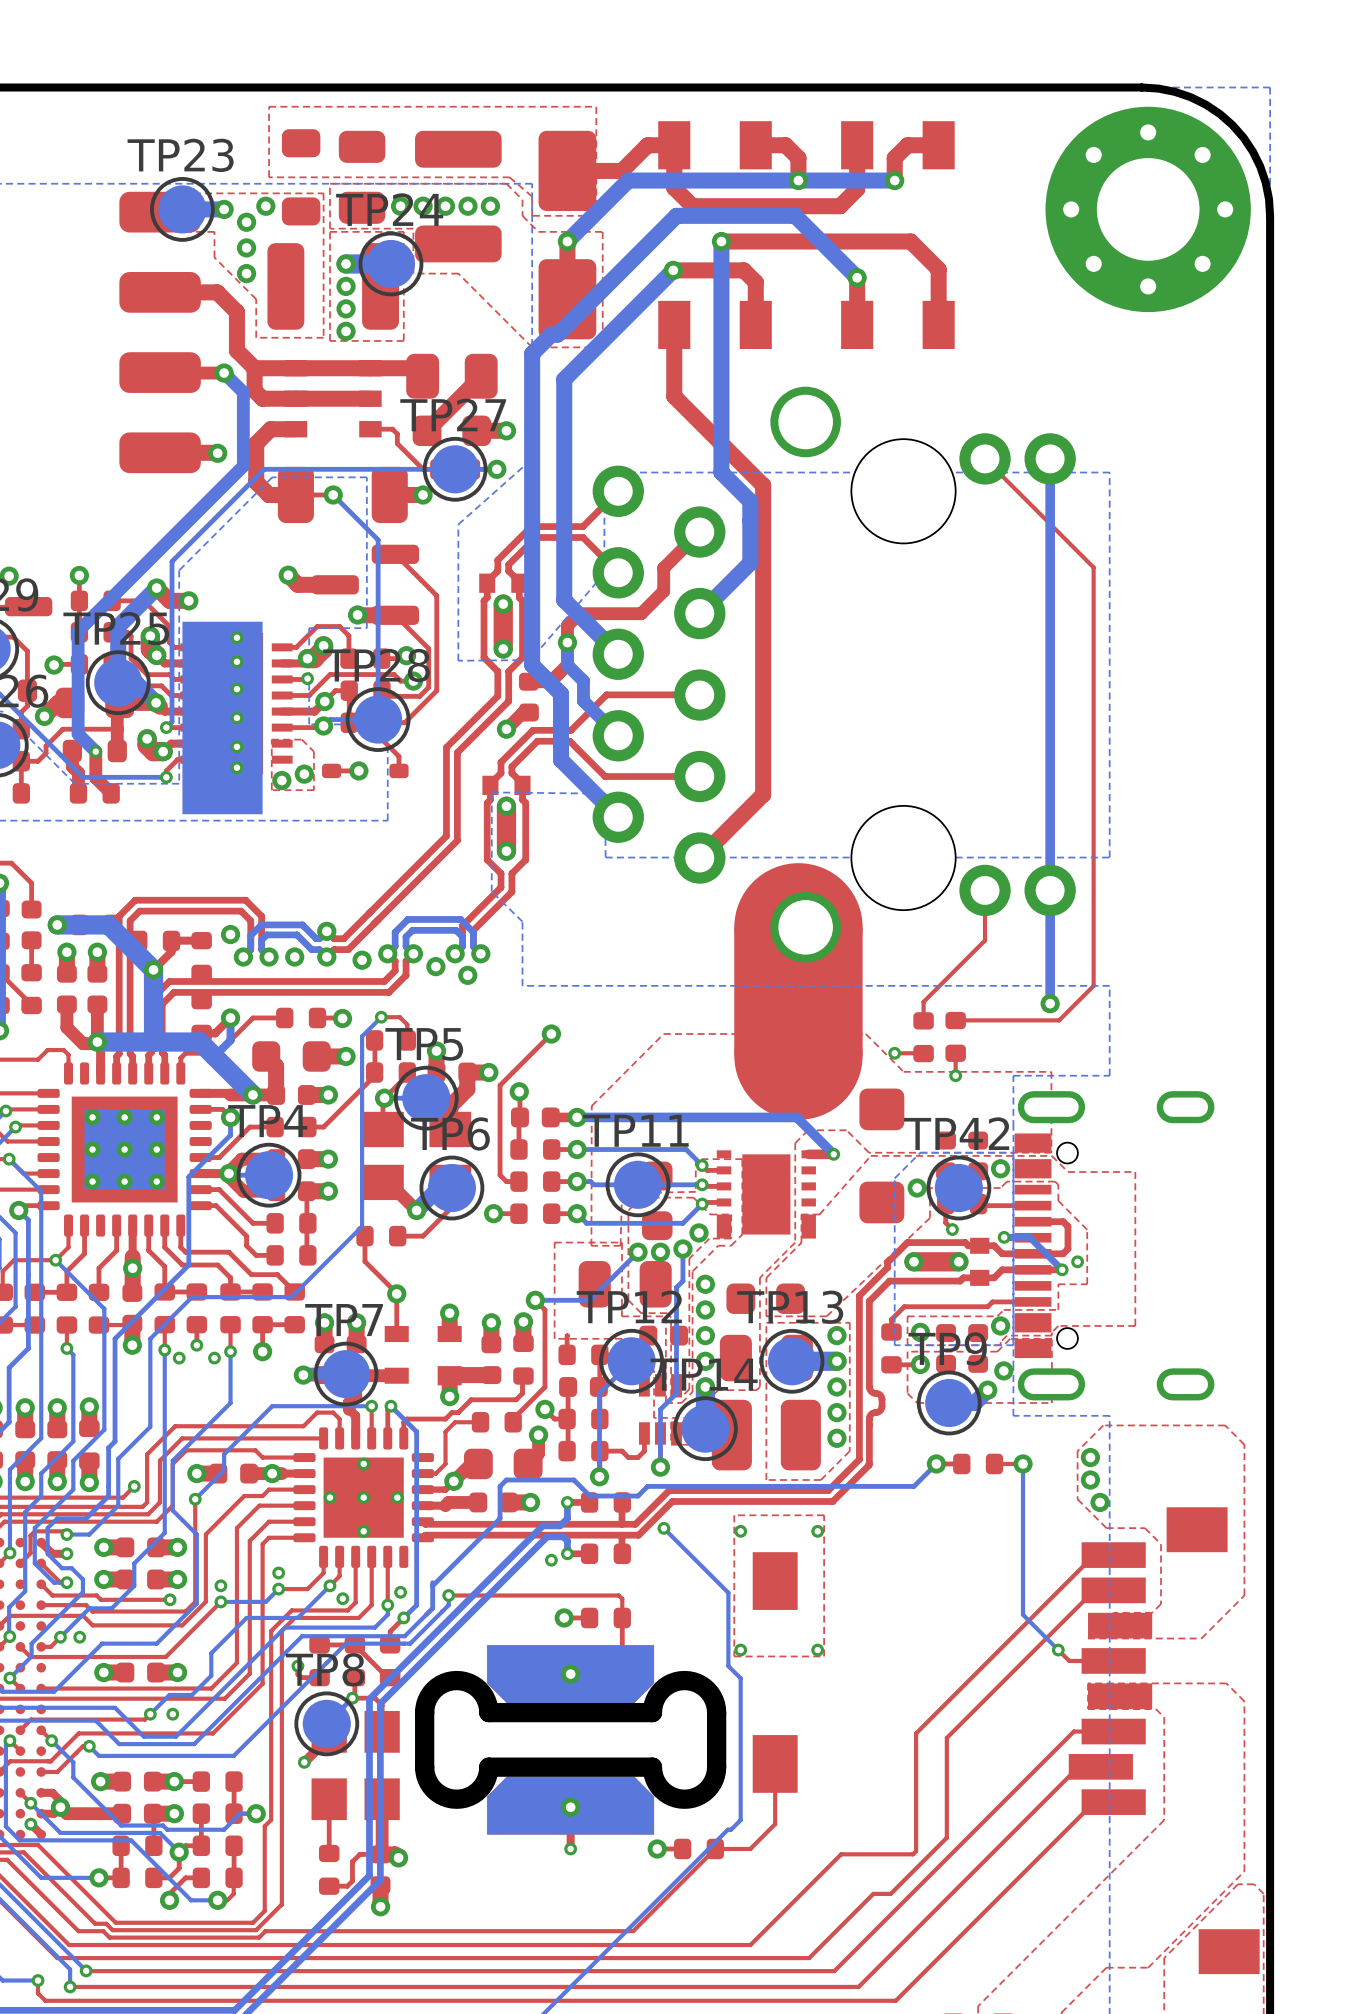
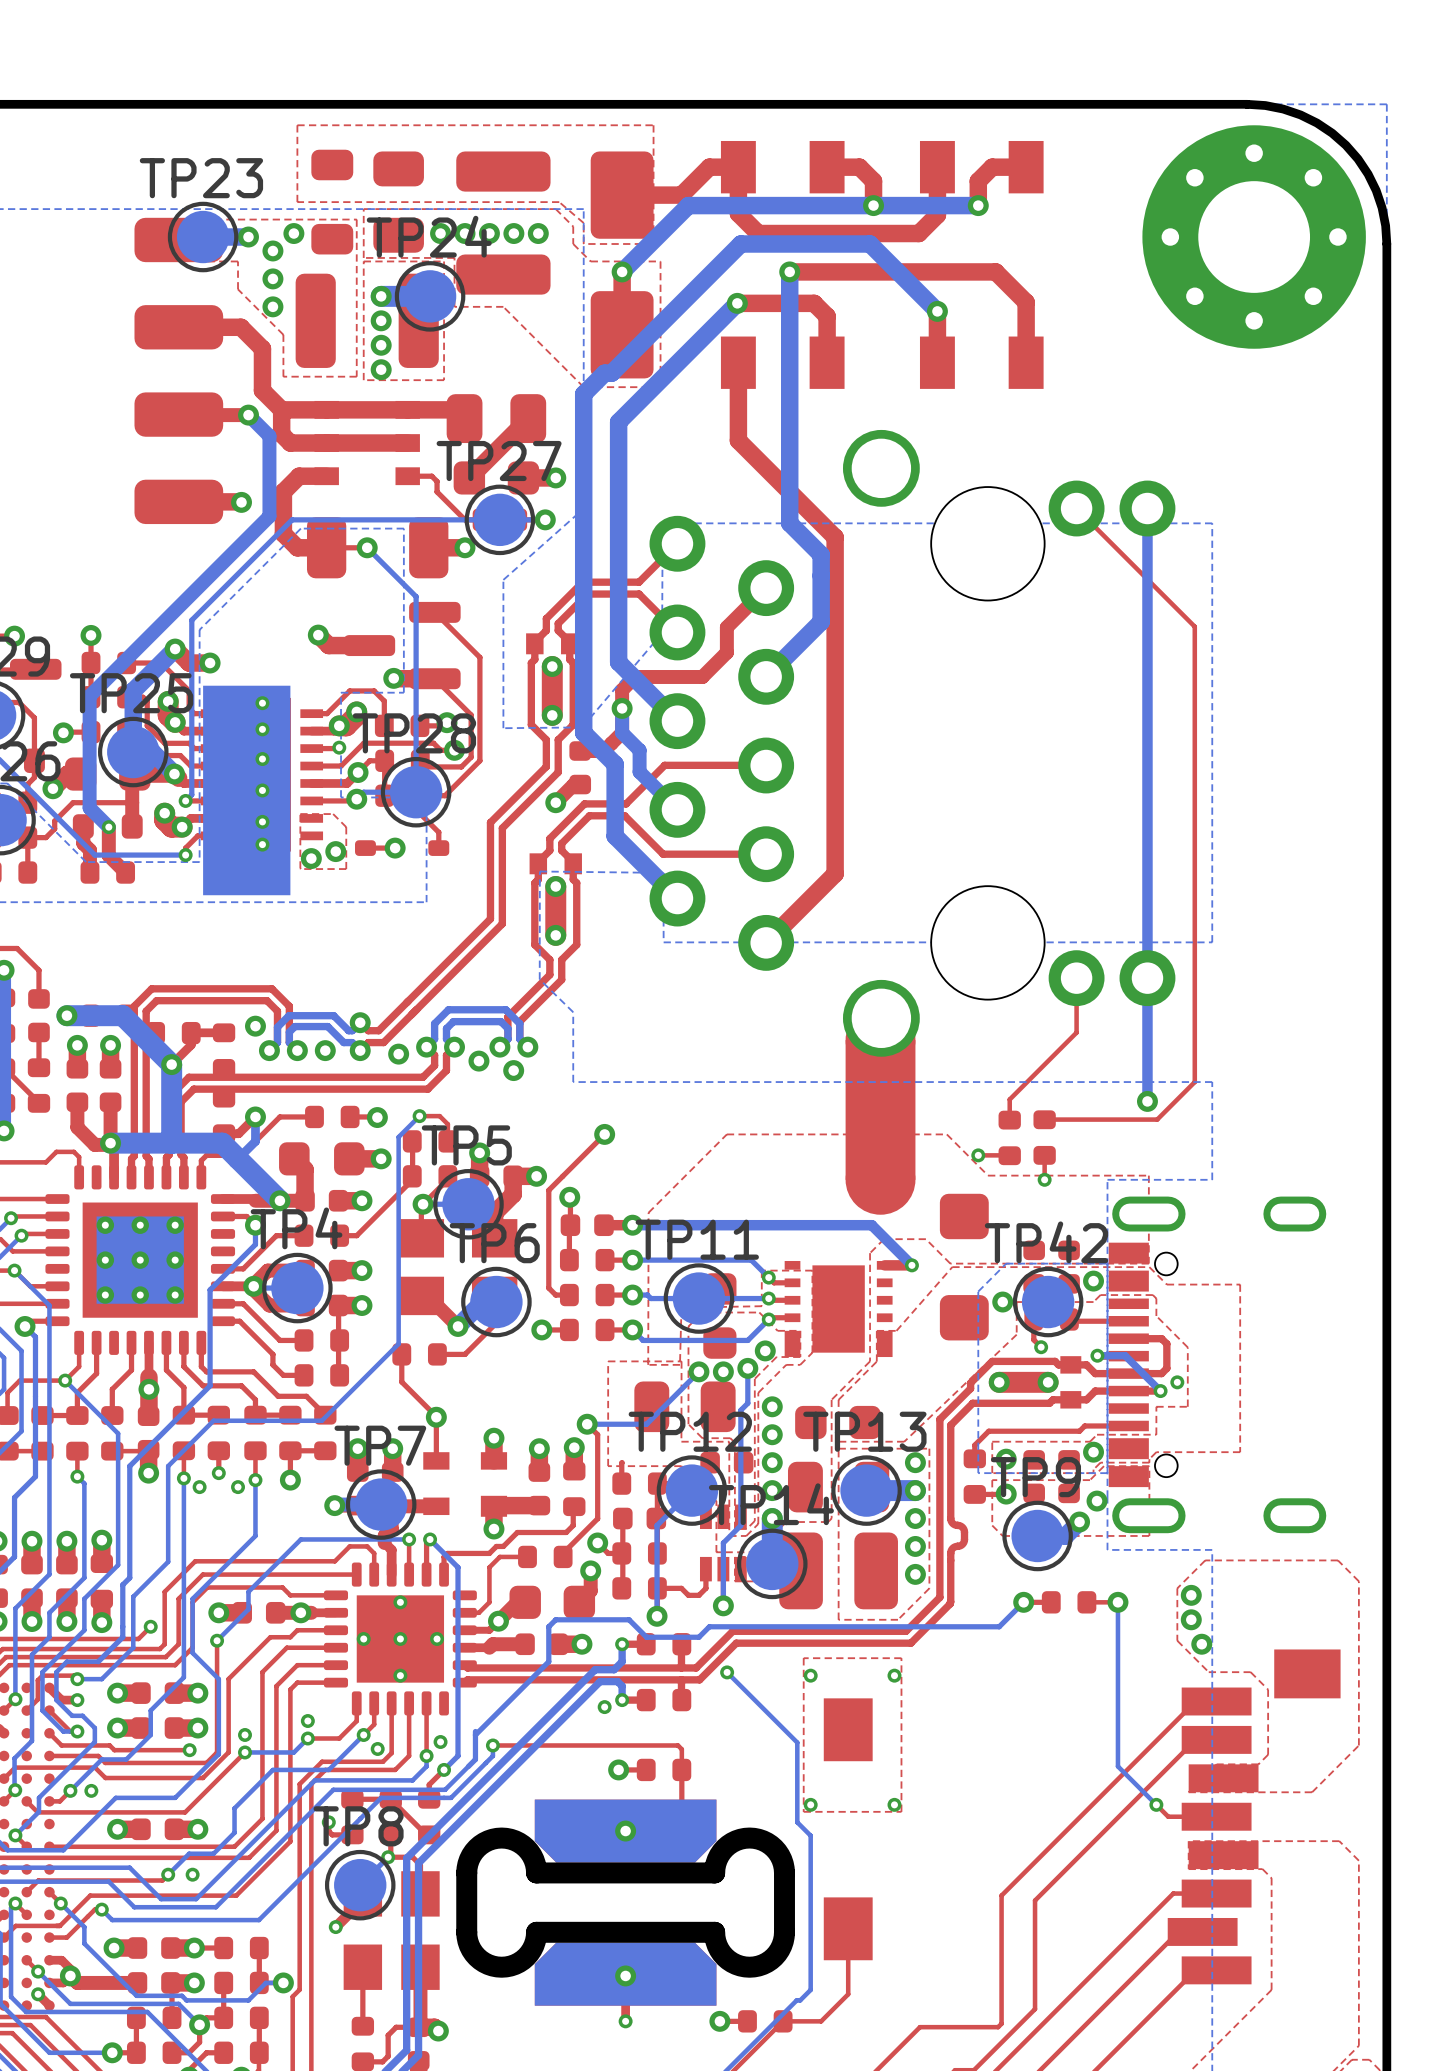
part footprint: [734, 863, 863, 1120] -> [845, 1005, 916, 1215]

